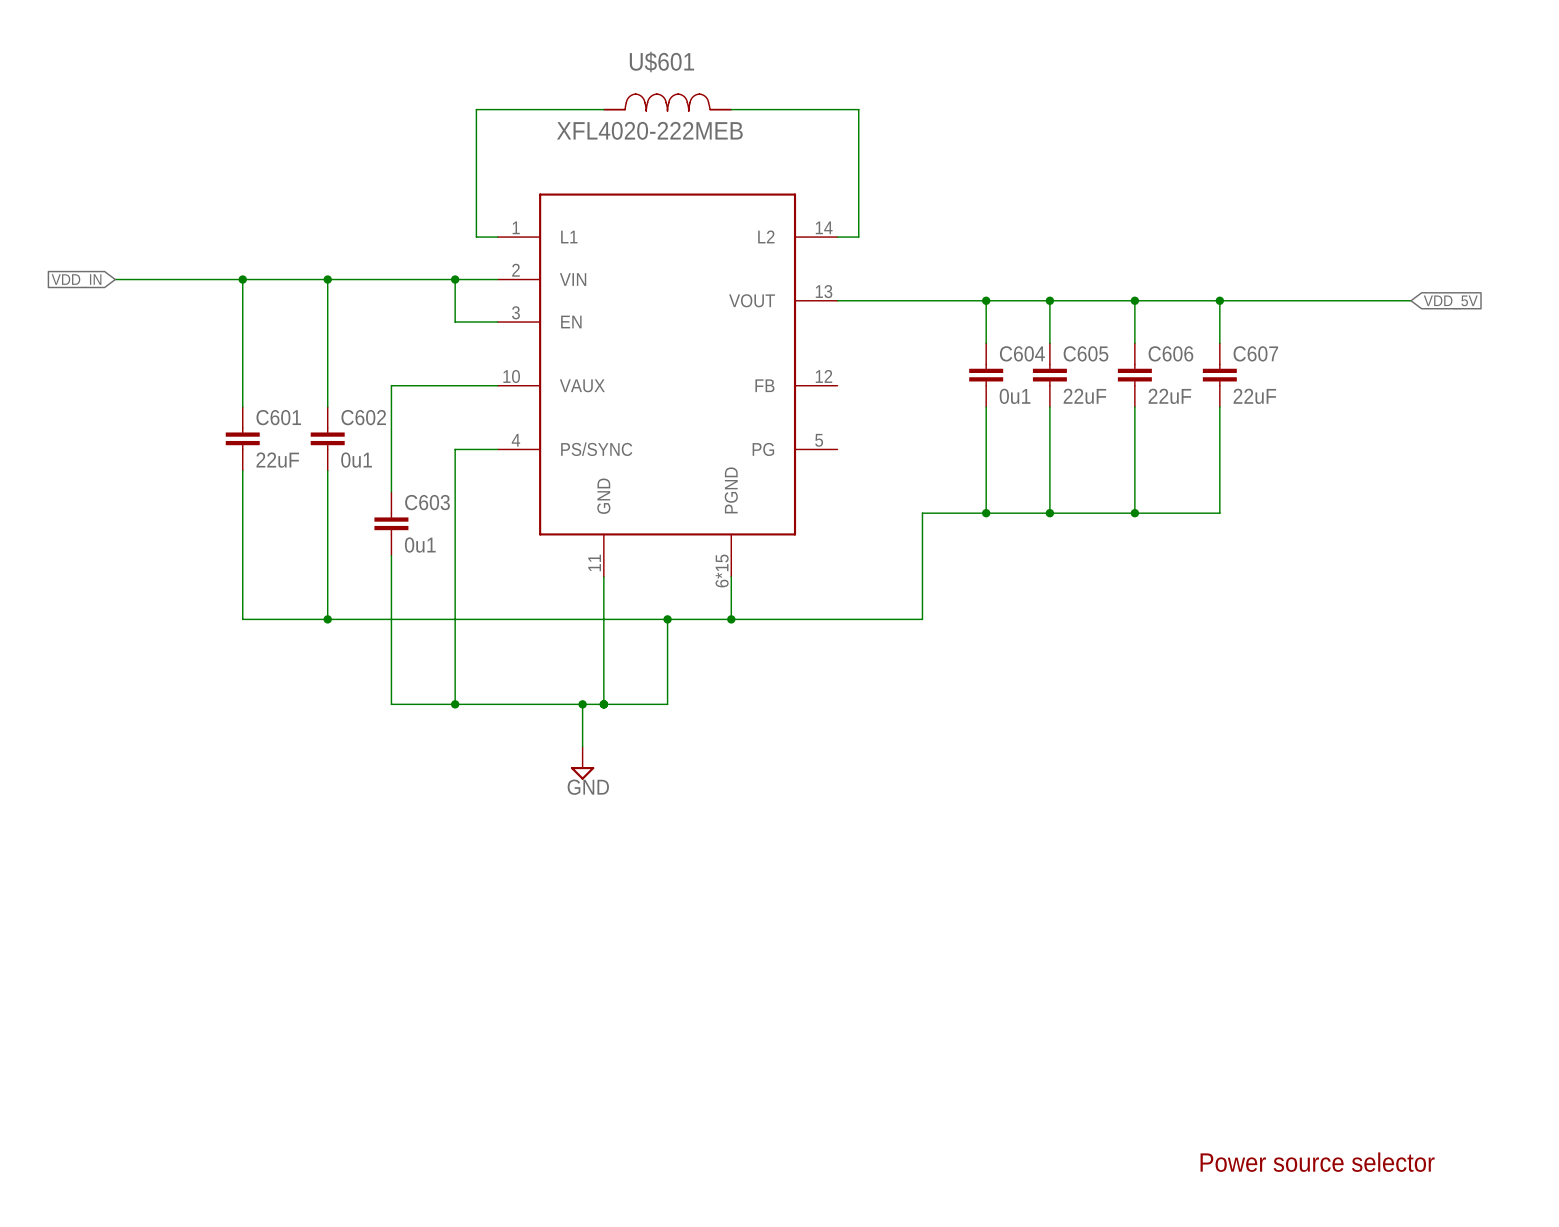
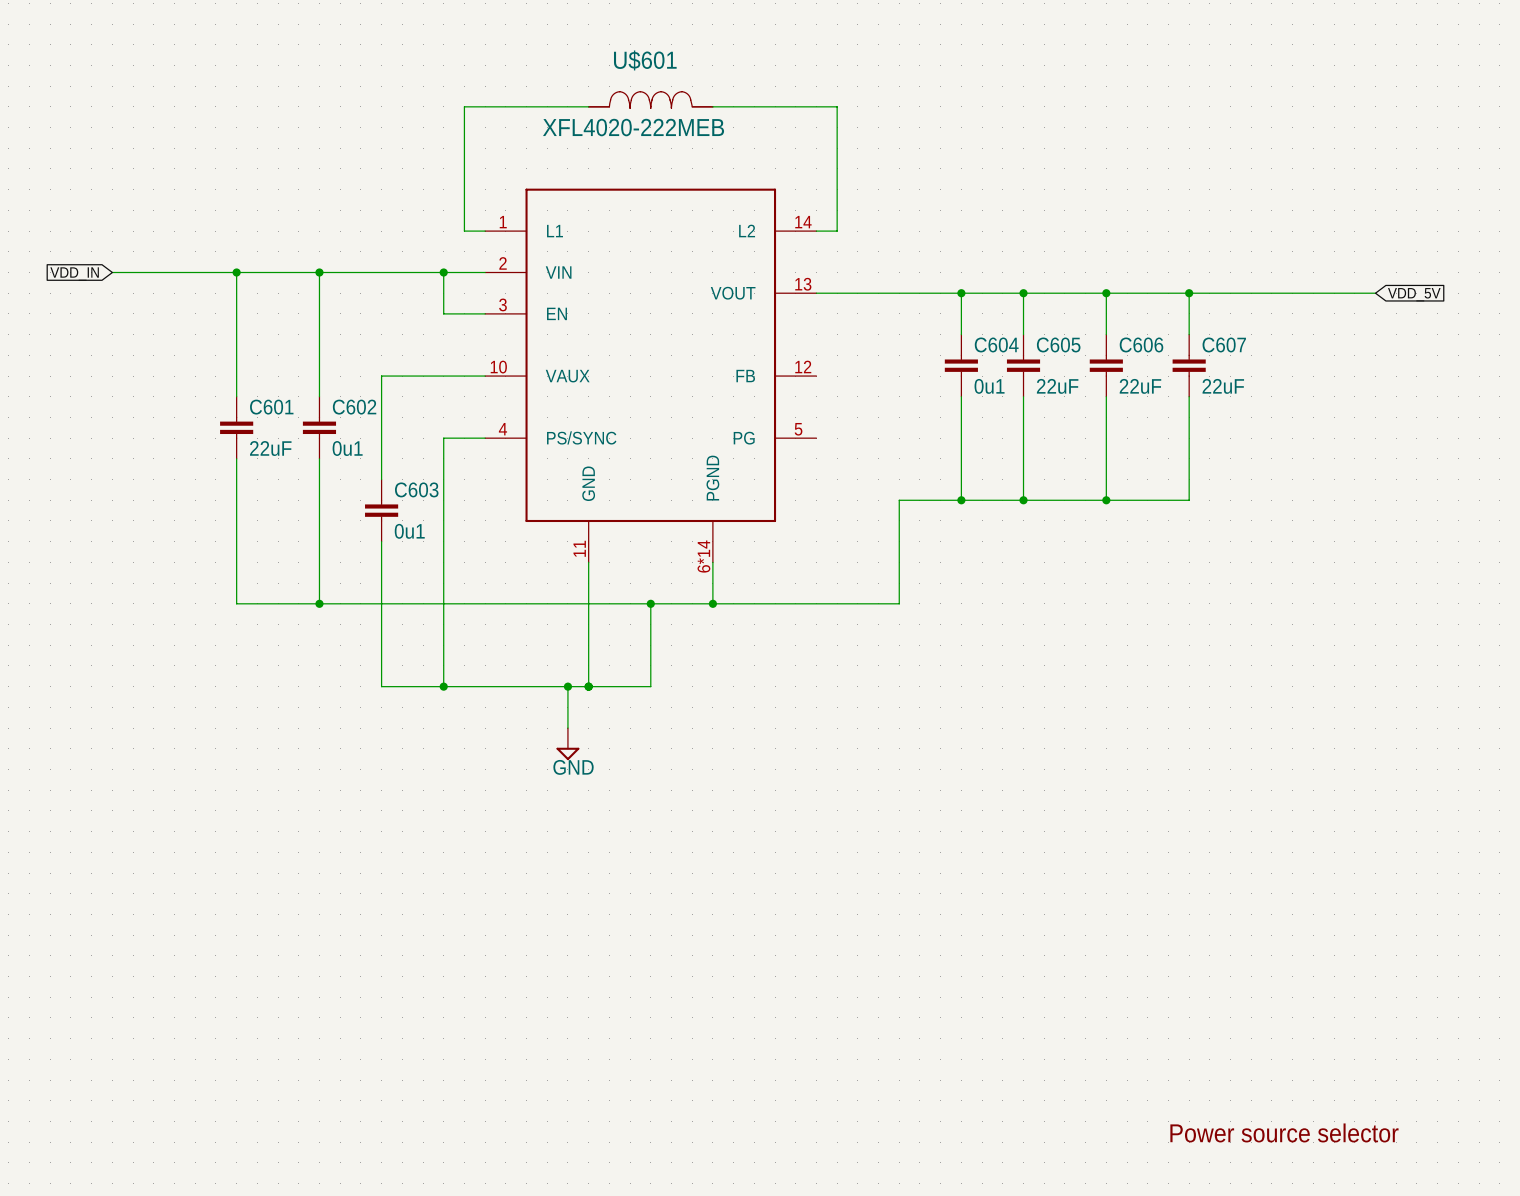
part pin number: 6*15 (722, 570) -> 6*14 (703, 556)

